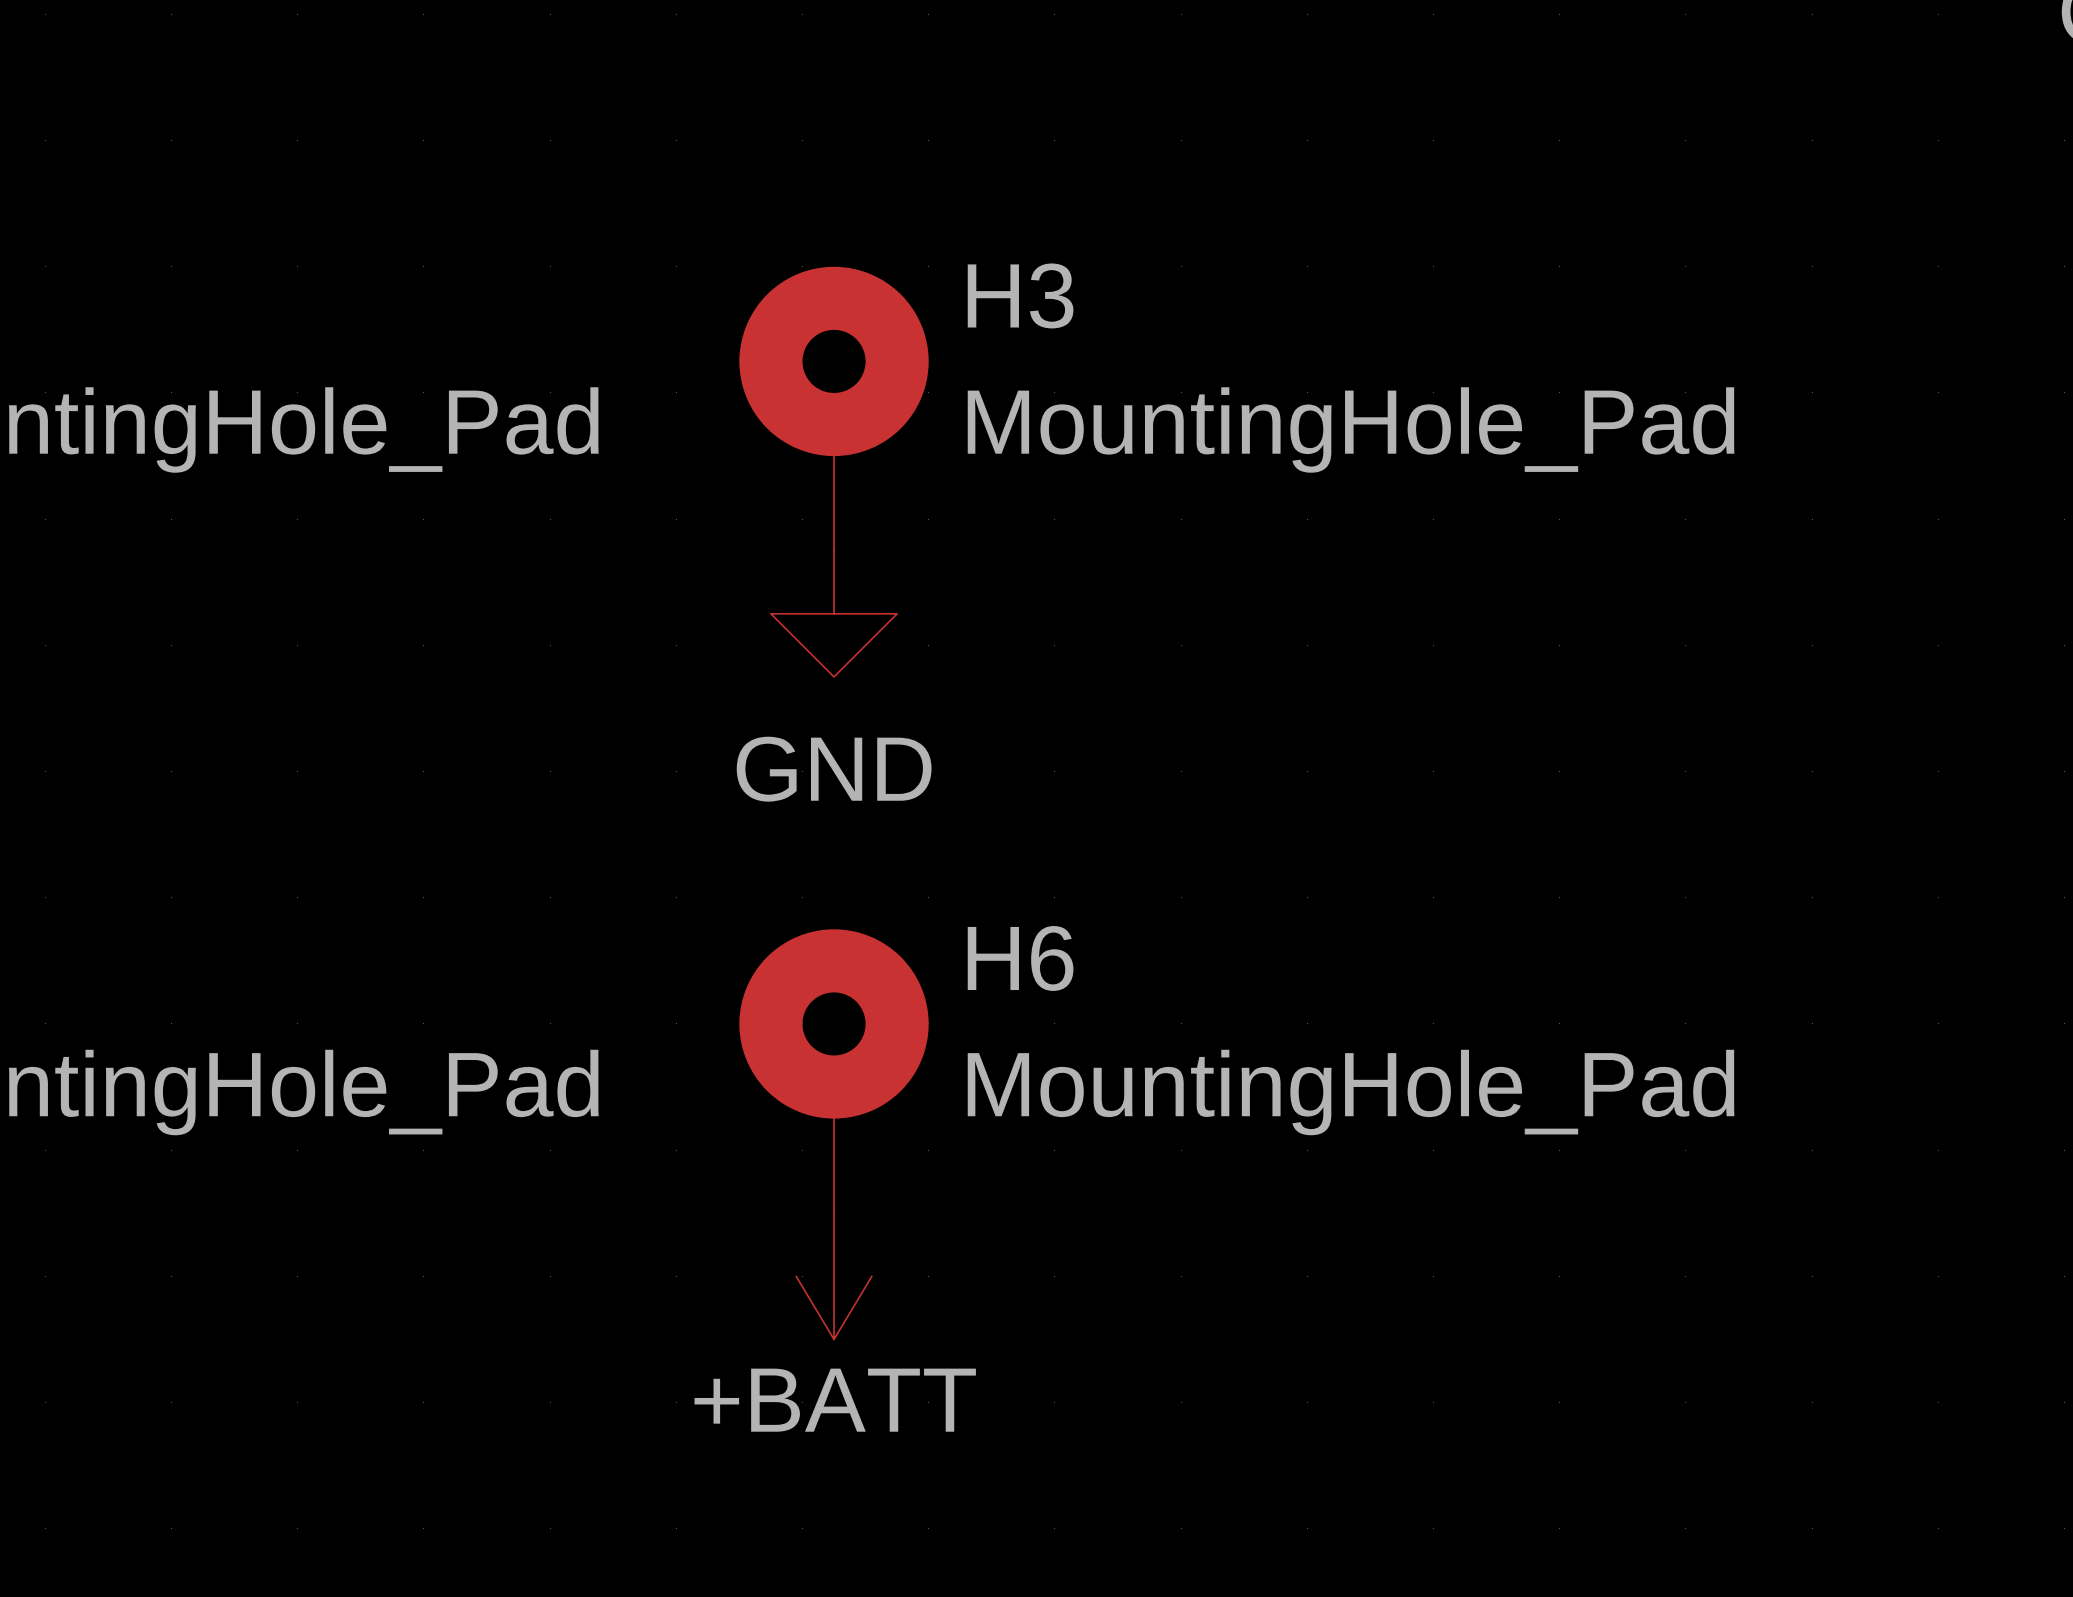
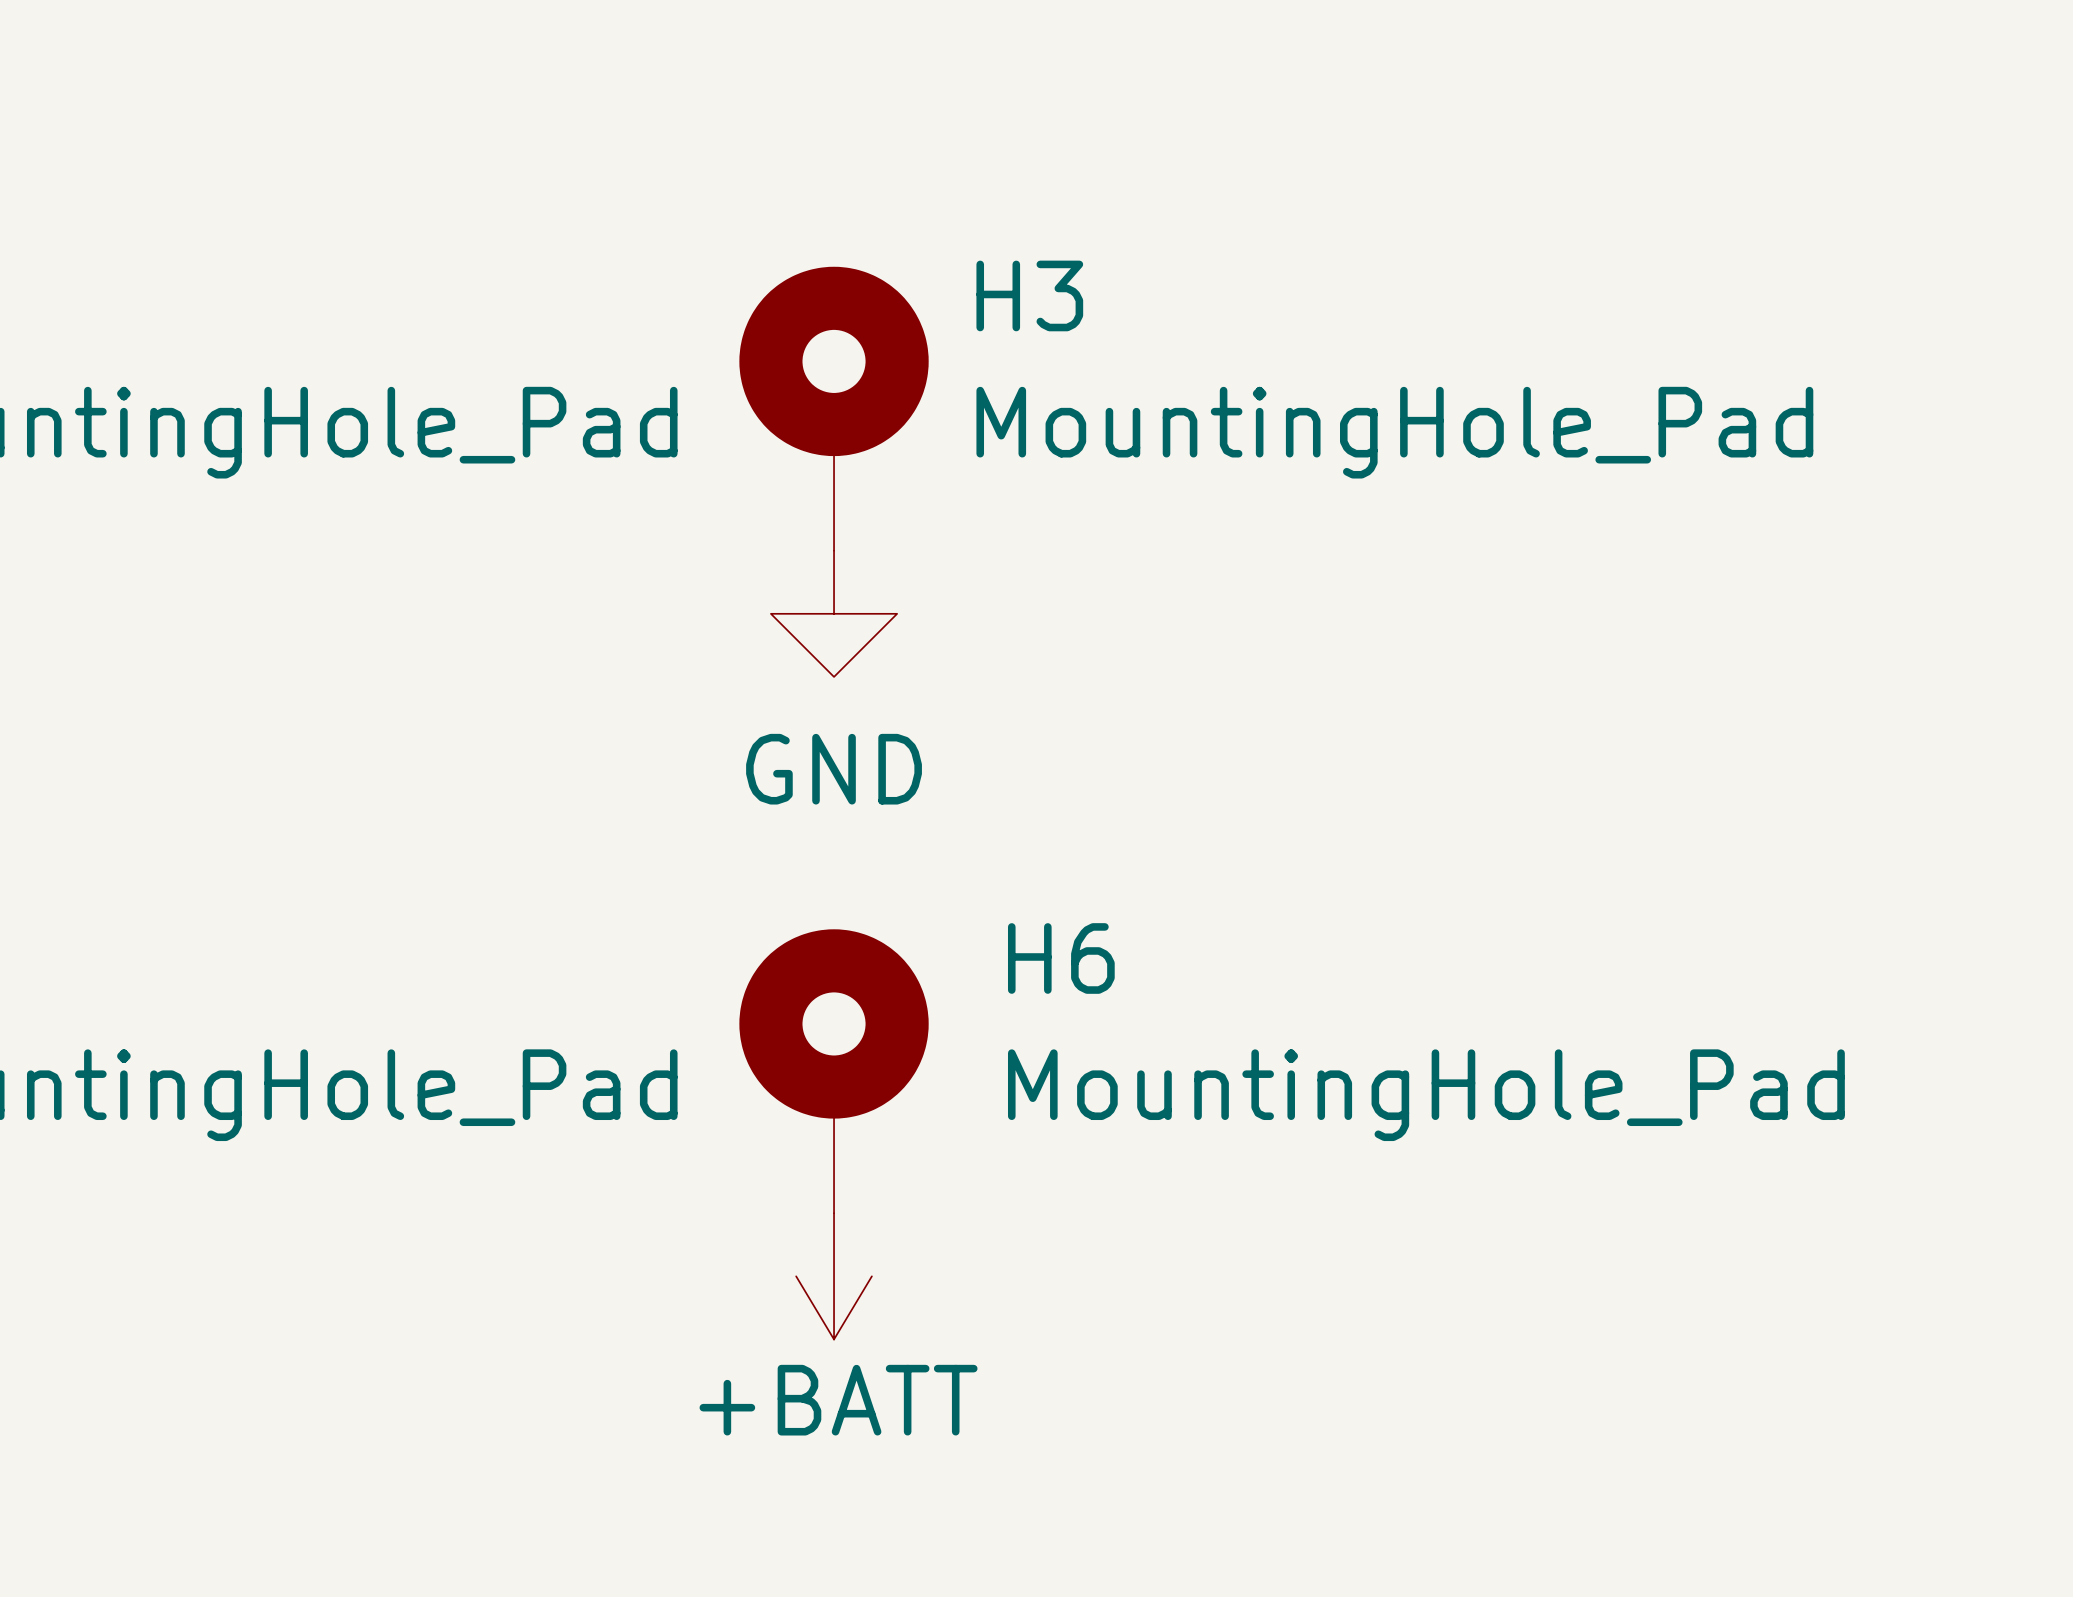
H6 name position: H6 (1020, 958) -> H6 (1061, 958)
H6 value position: MountingHole_Pad (1351, 1092) -> MountingHole_Pad (1426, 1095)

